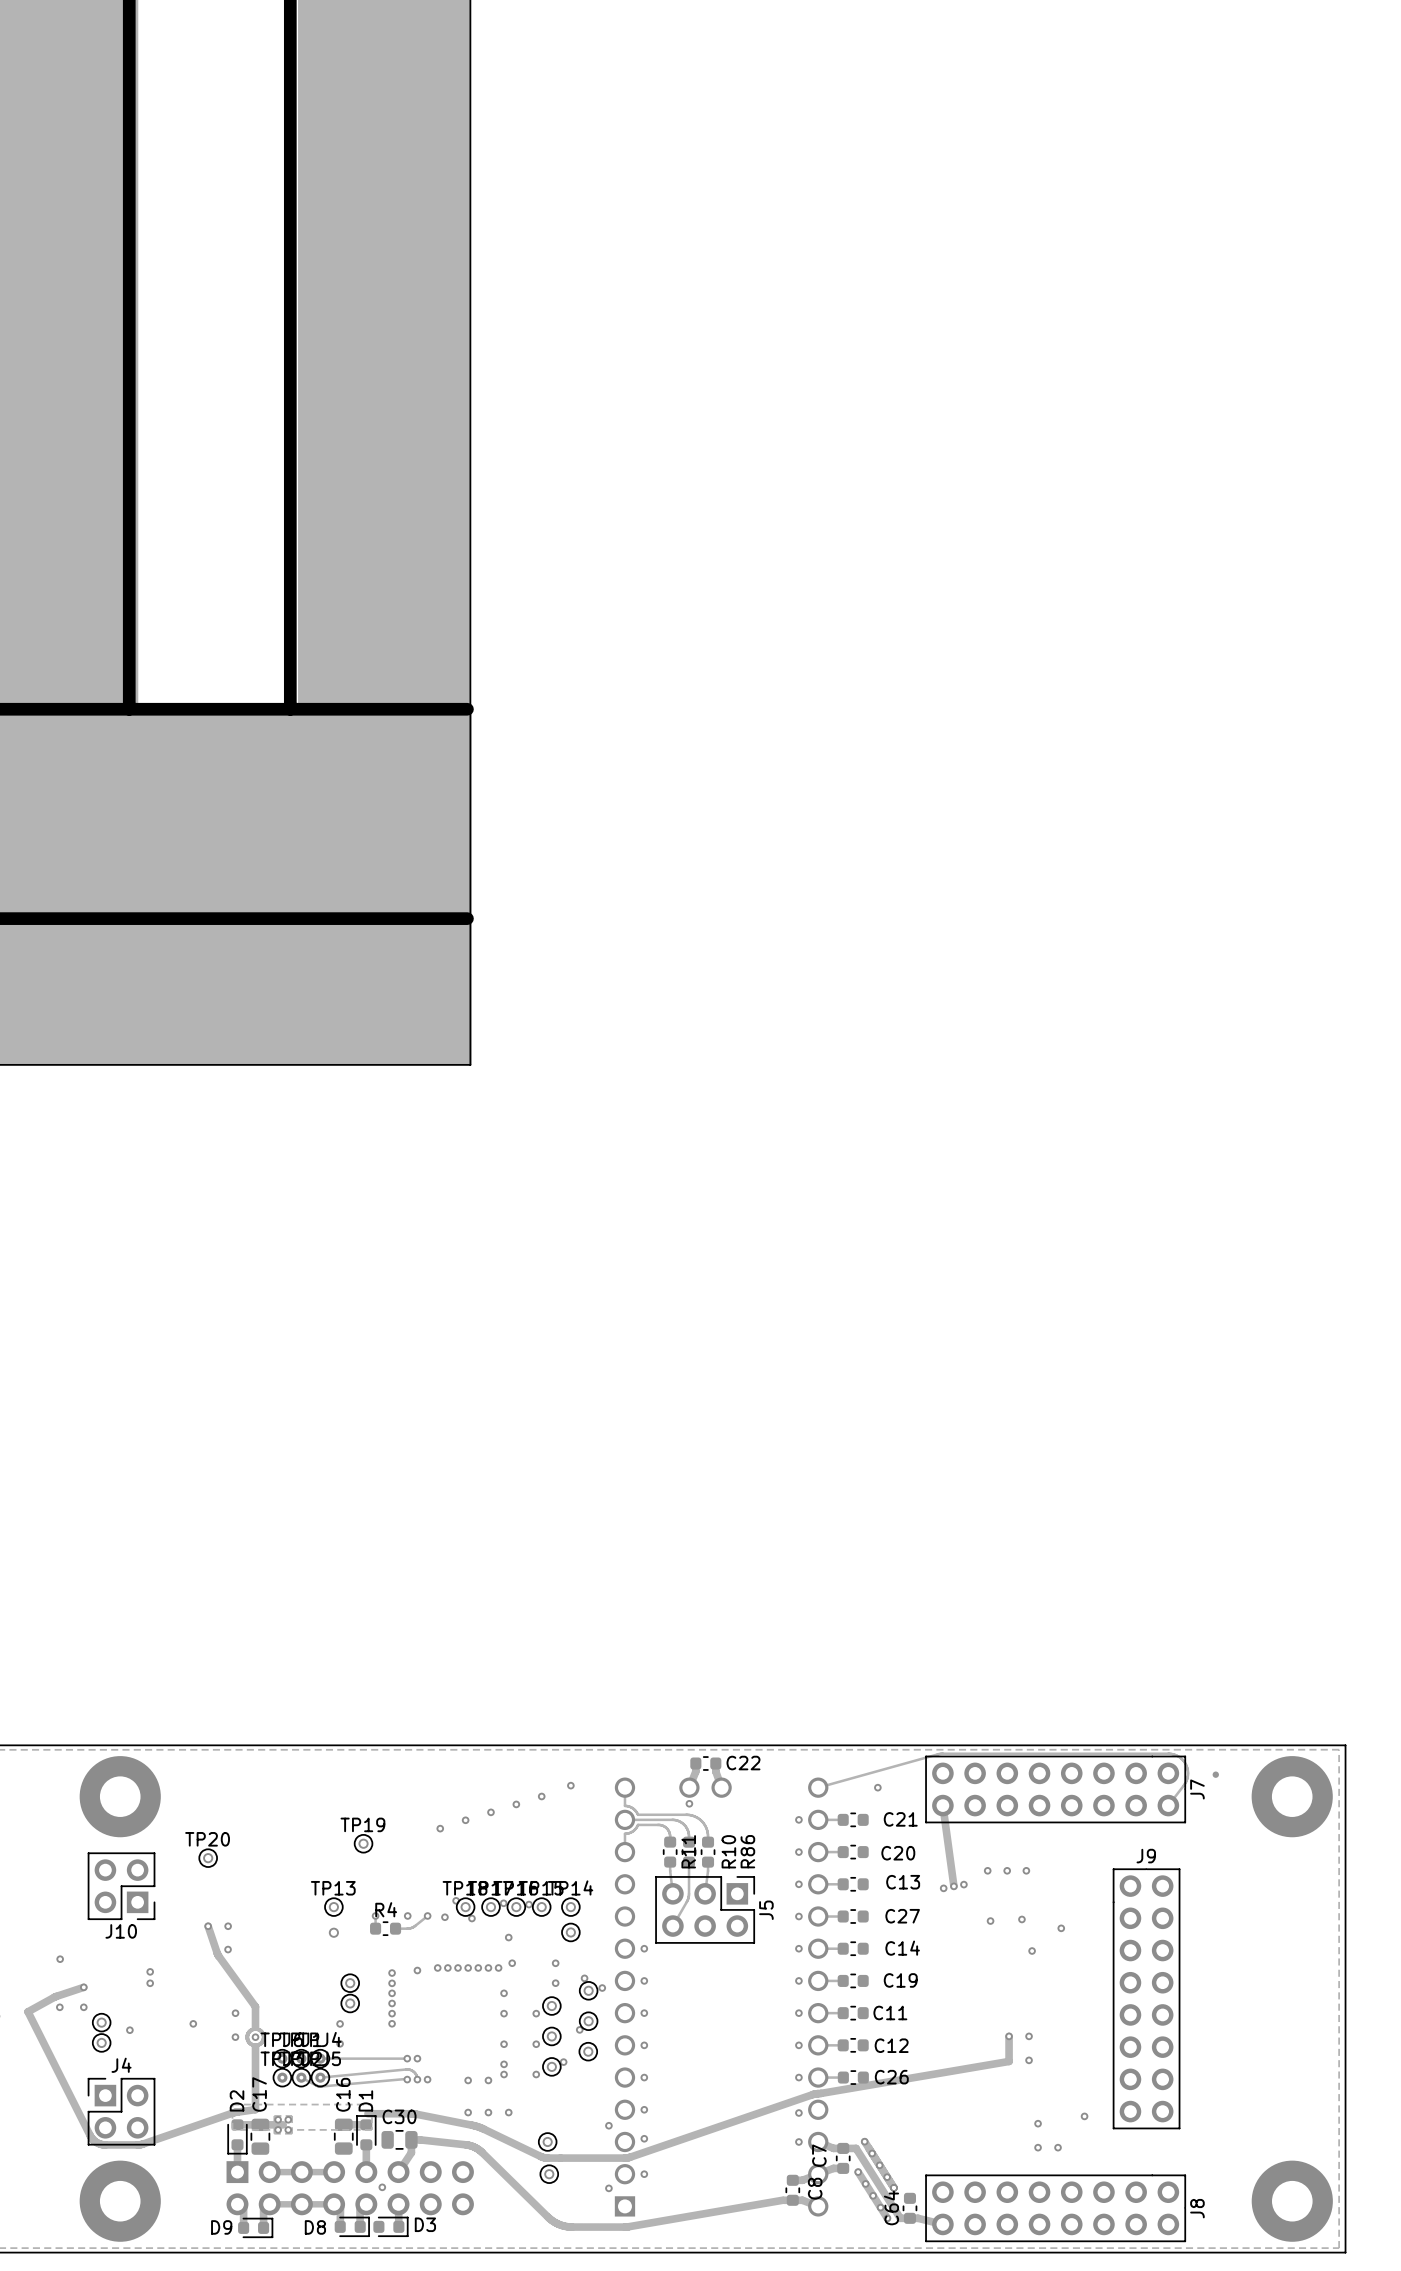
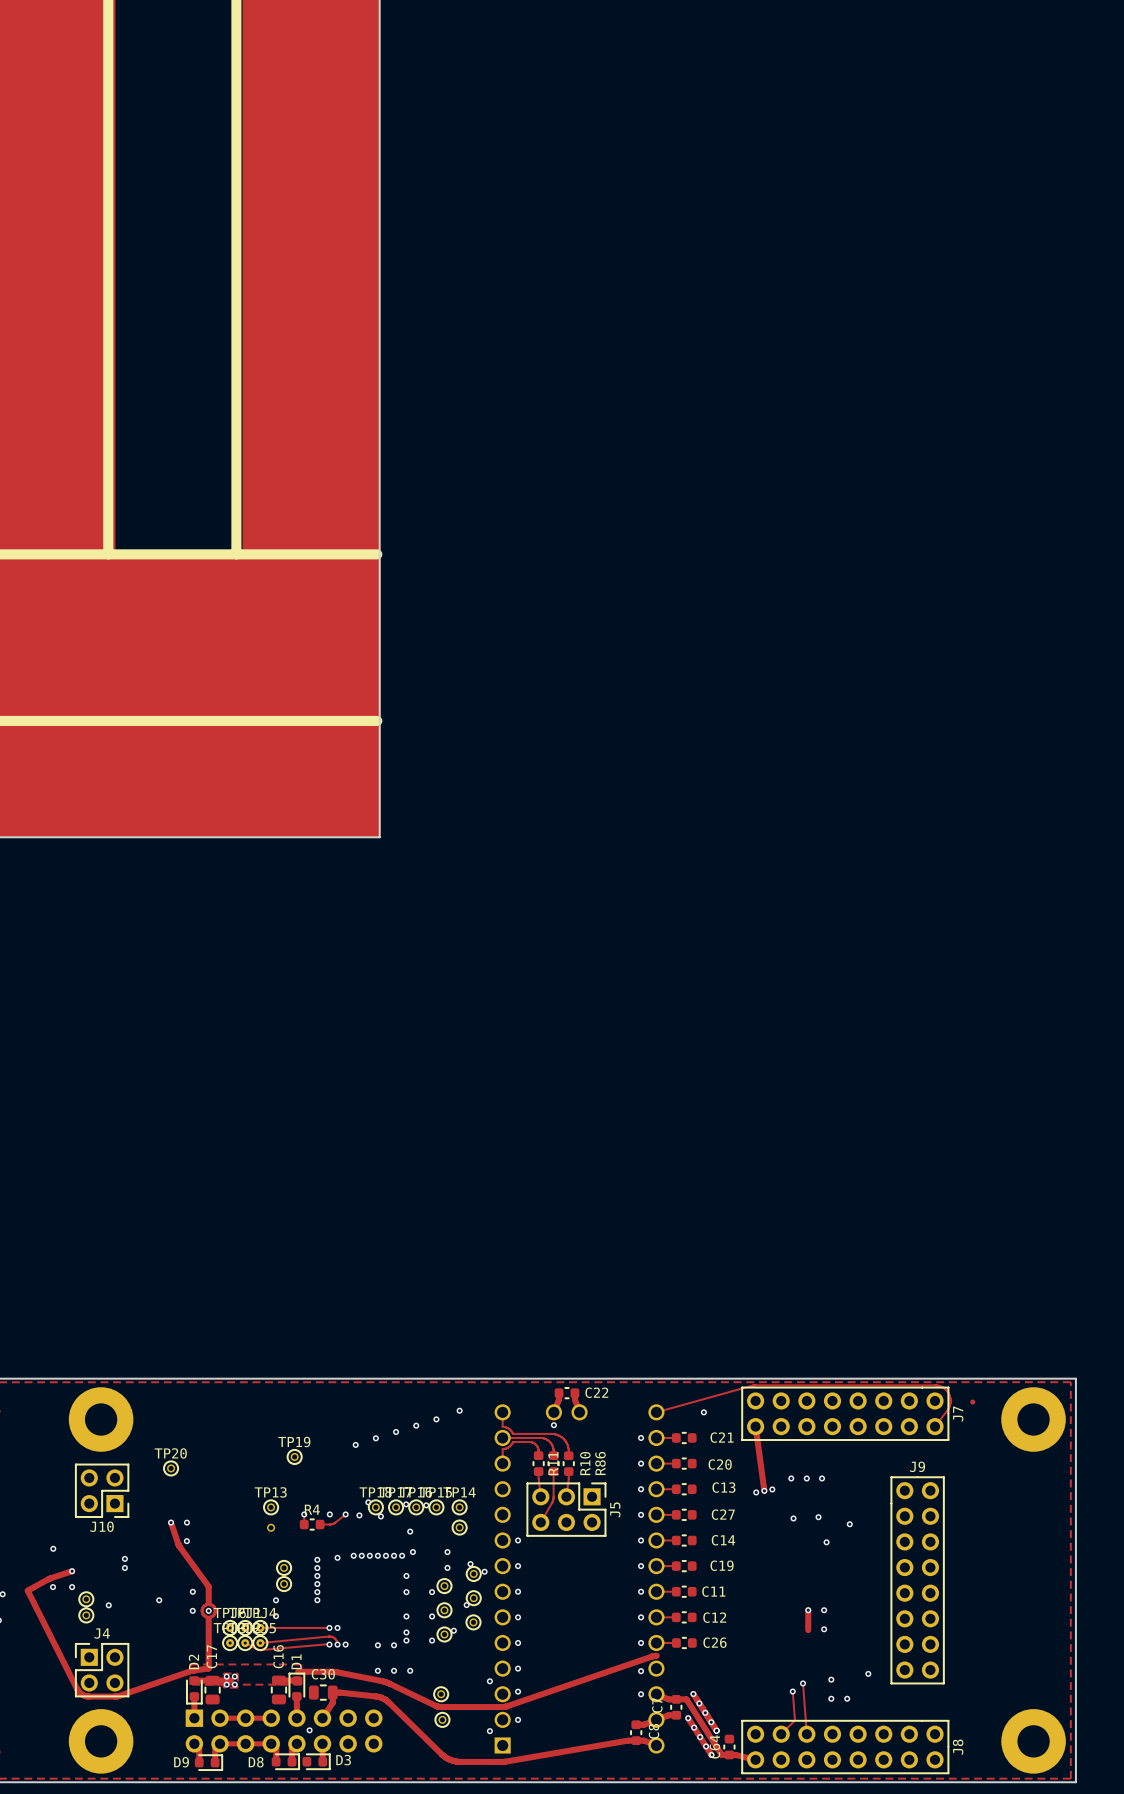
track: (1009, 2061) (817, 2093) -> none
track: none -> (803, 1683) (806, 1734)
via: none -> (803, 1683)
track: none -> (792, 1691) (794, 1720) (781, 1734)
via: none -> (792, 1691)

